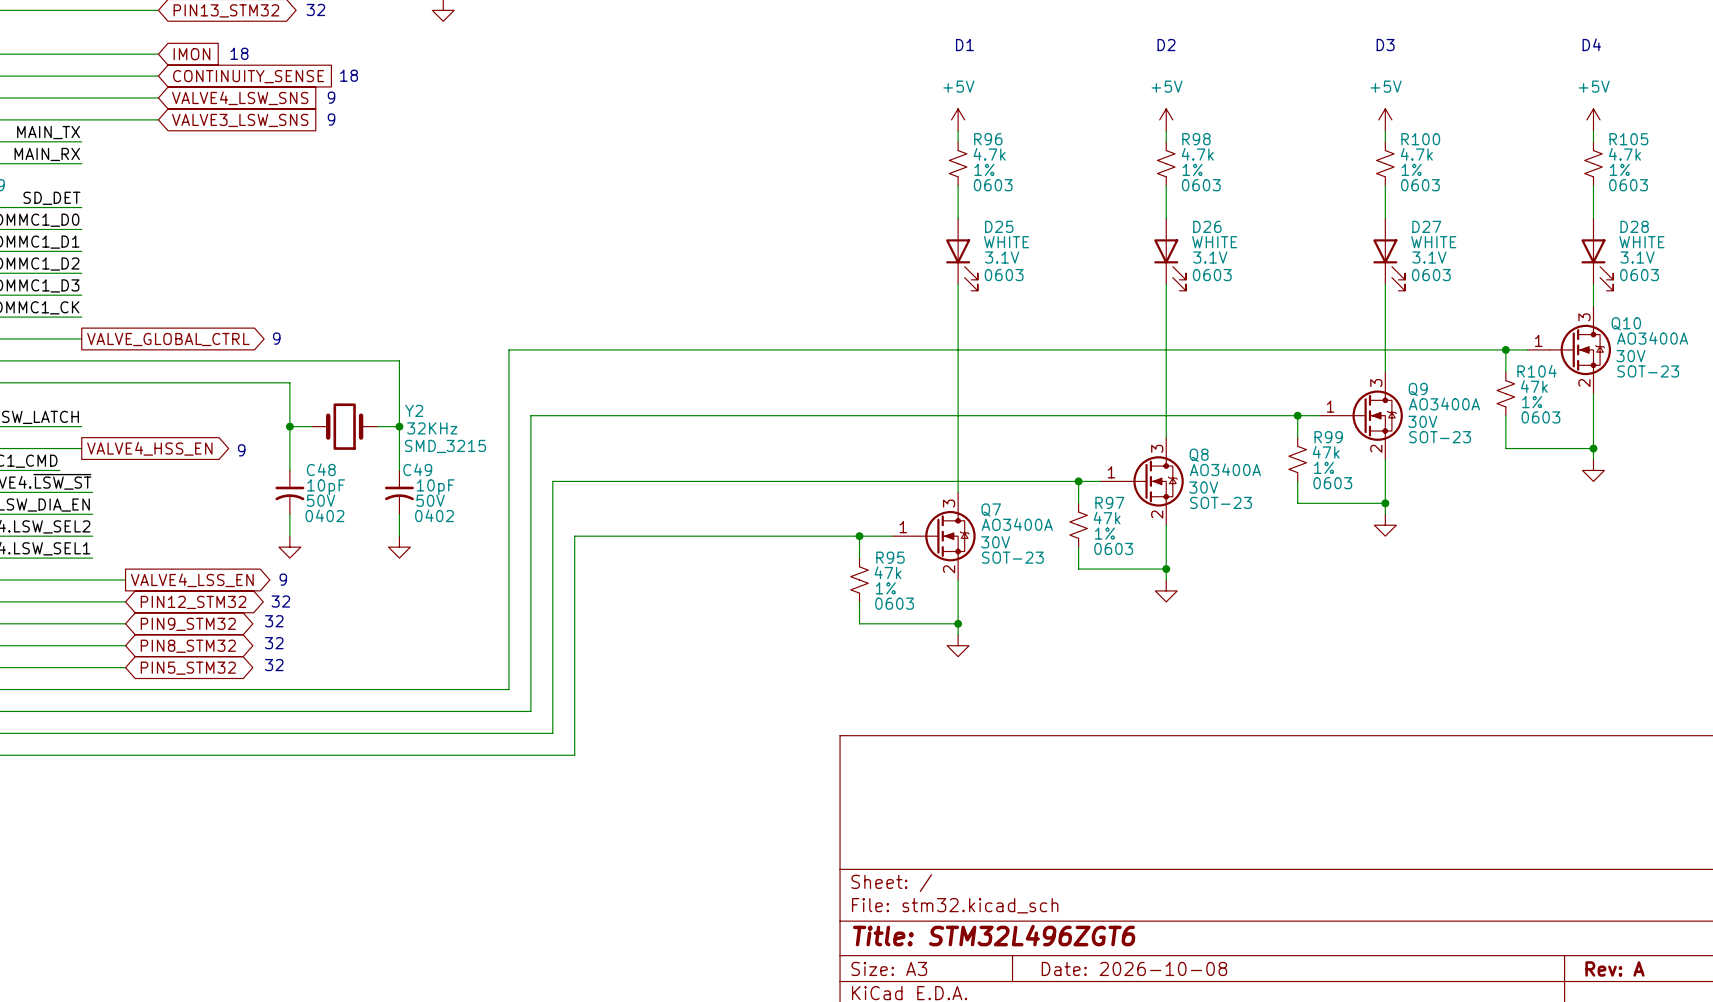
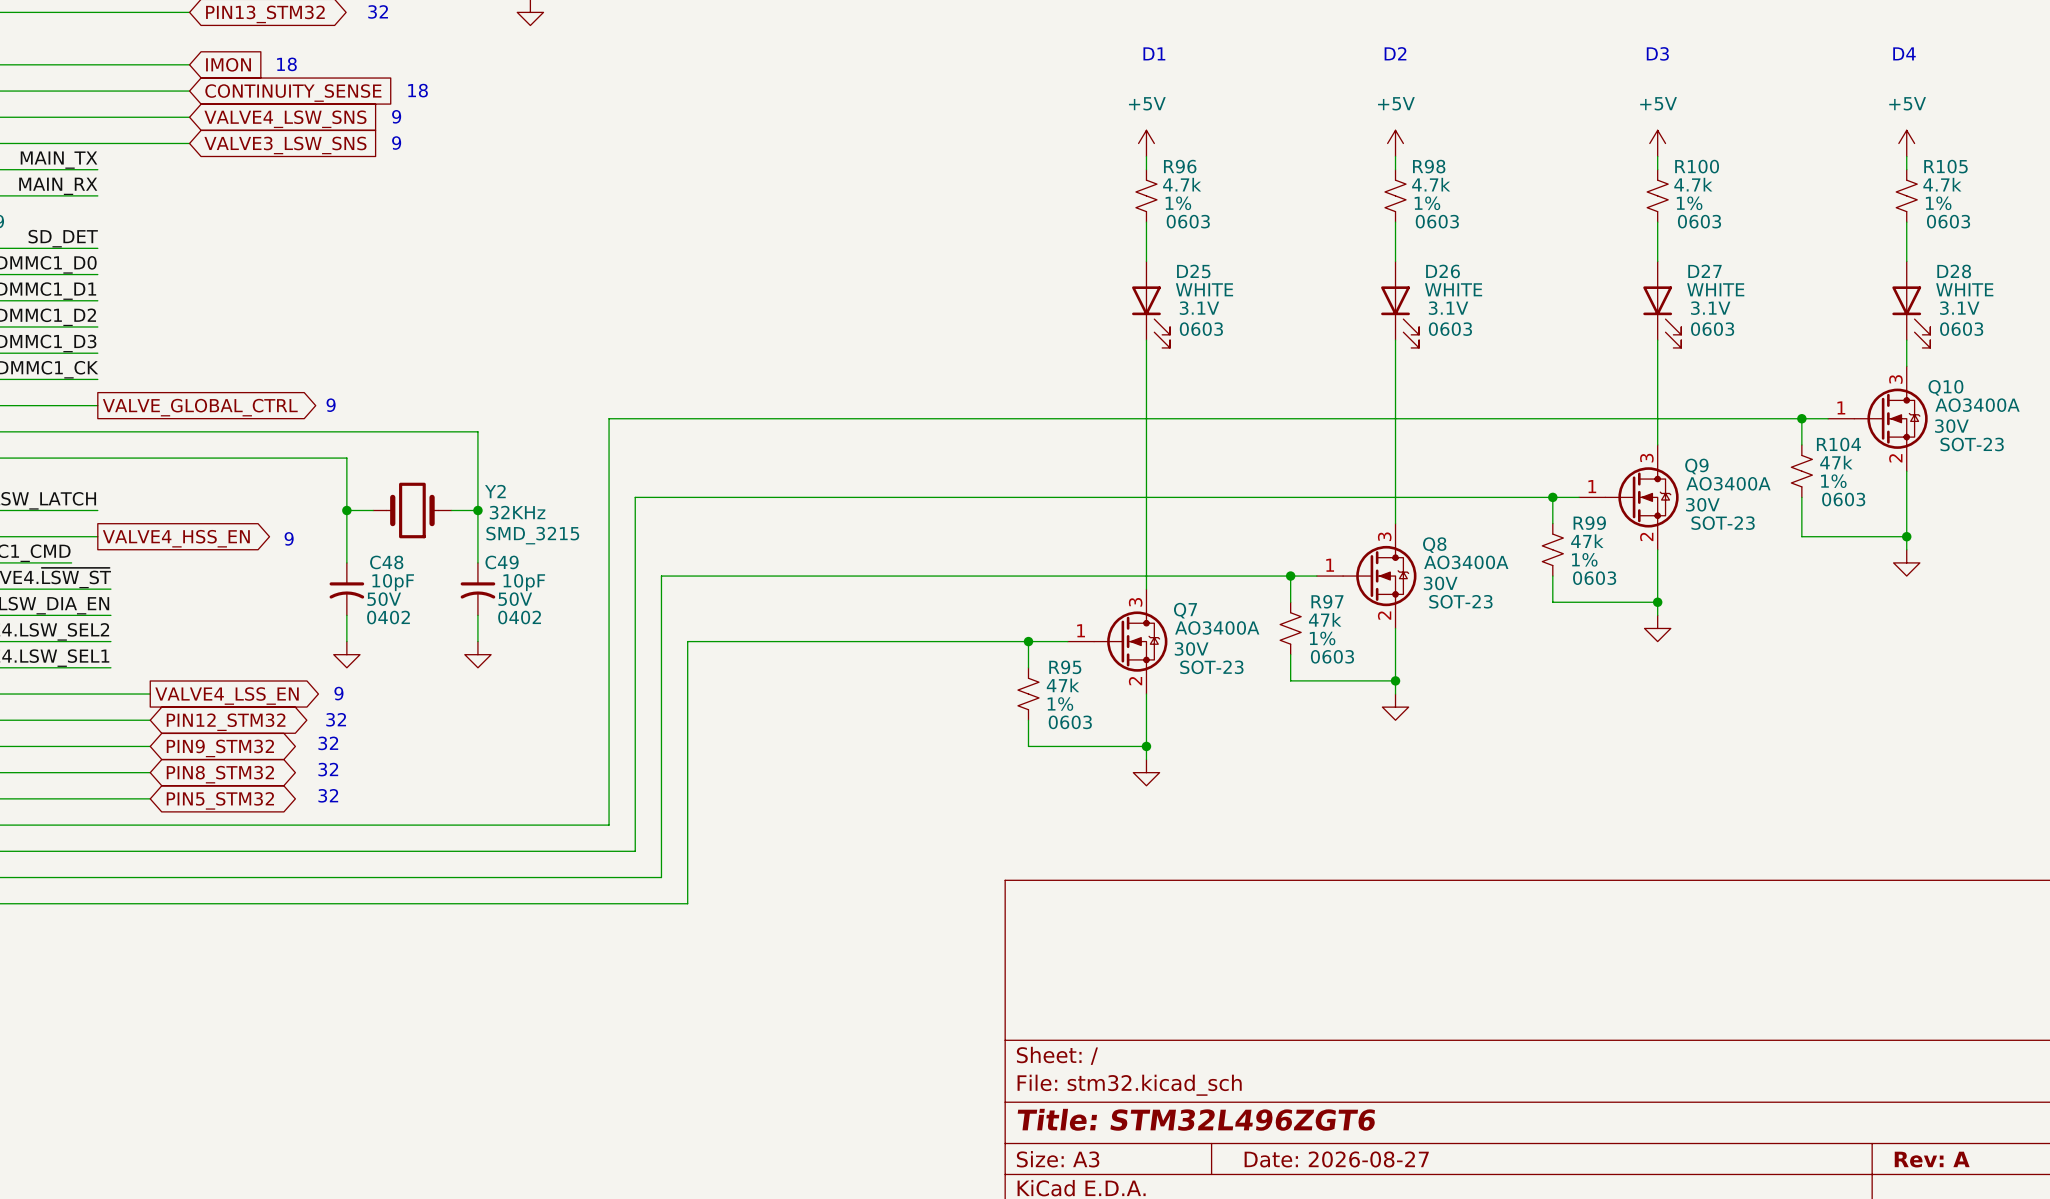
title block: Date: 2026-10-08 (1134, 968) -> Date: 2026-08-27 (1336, 1159)

